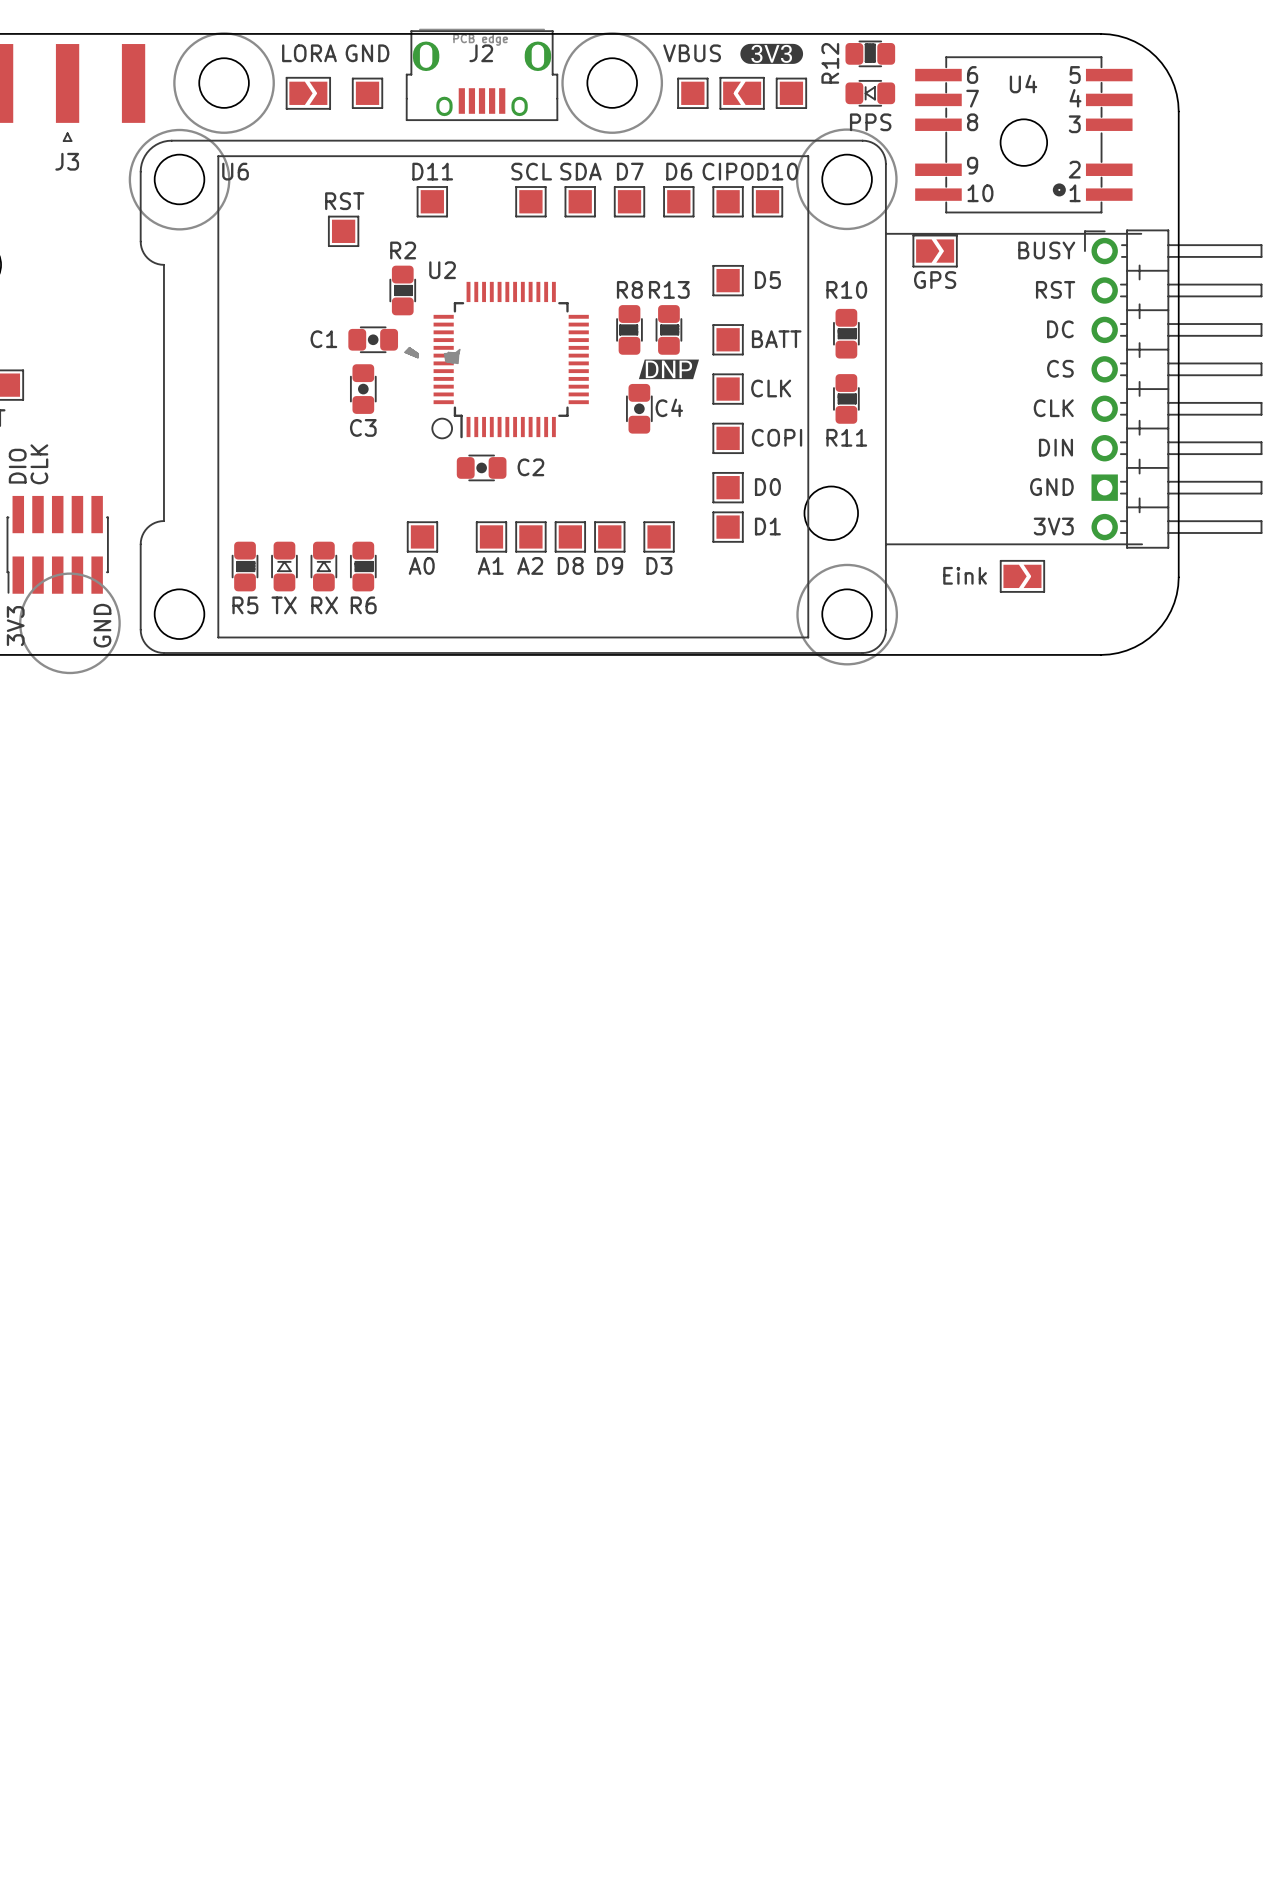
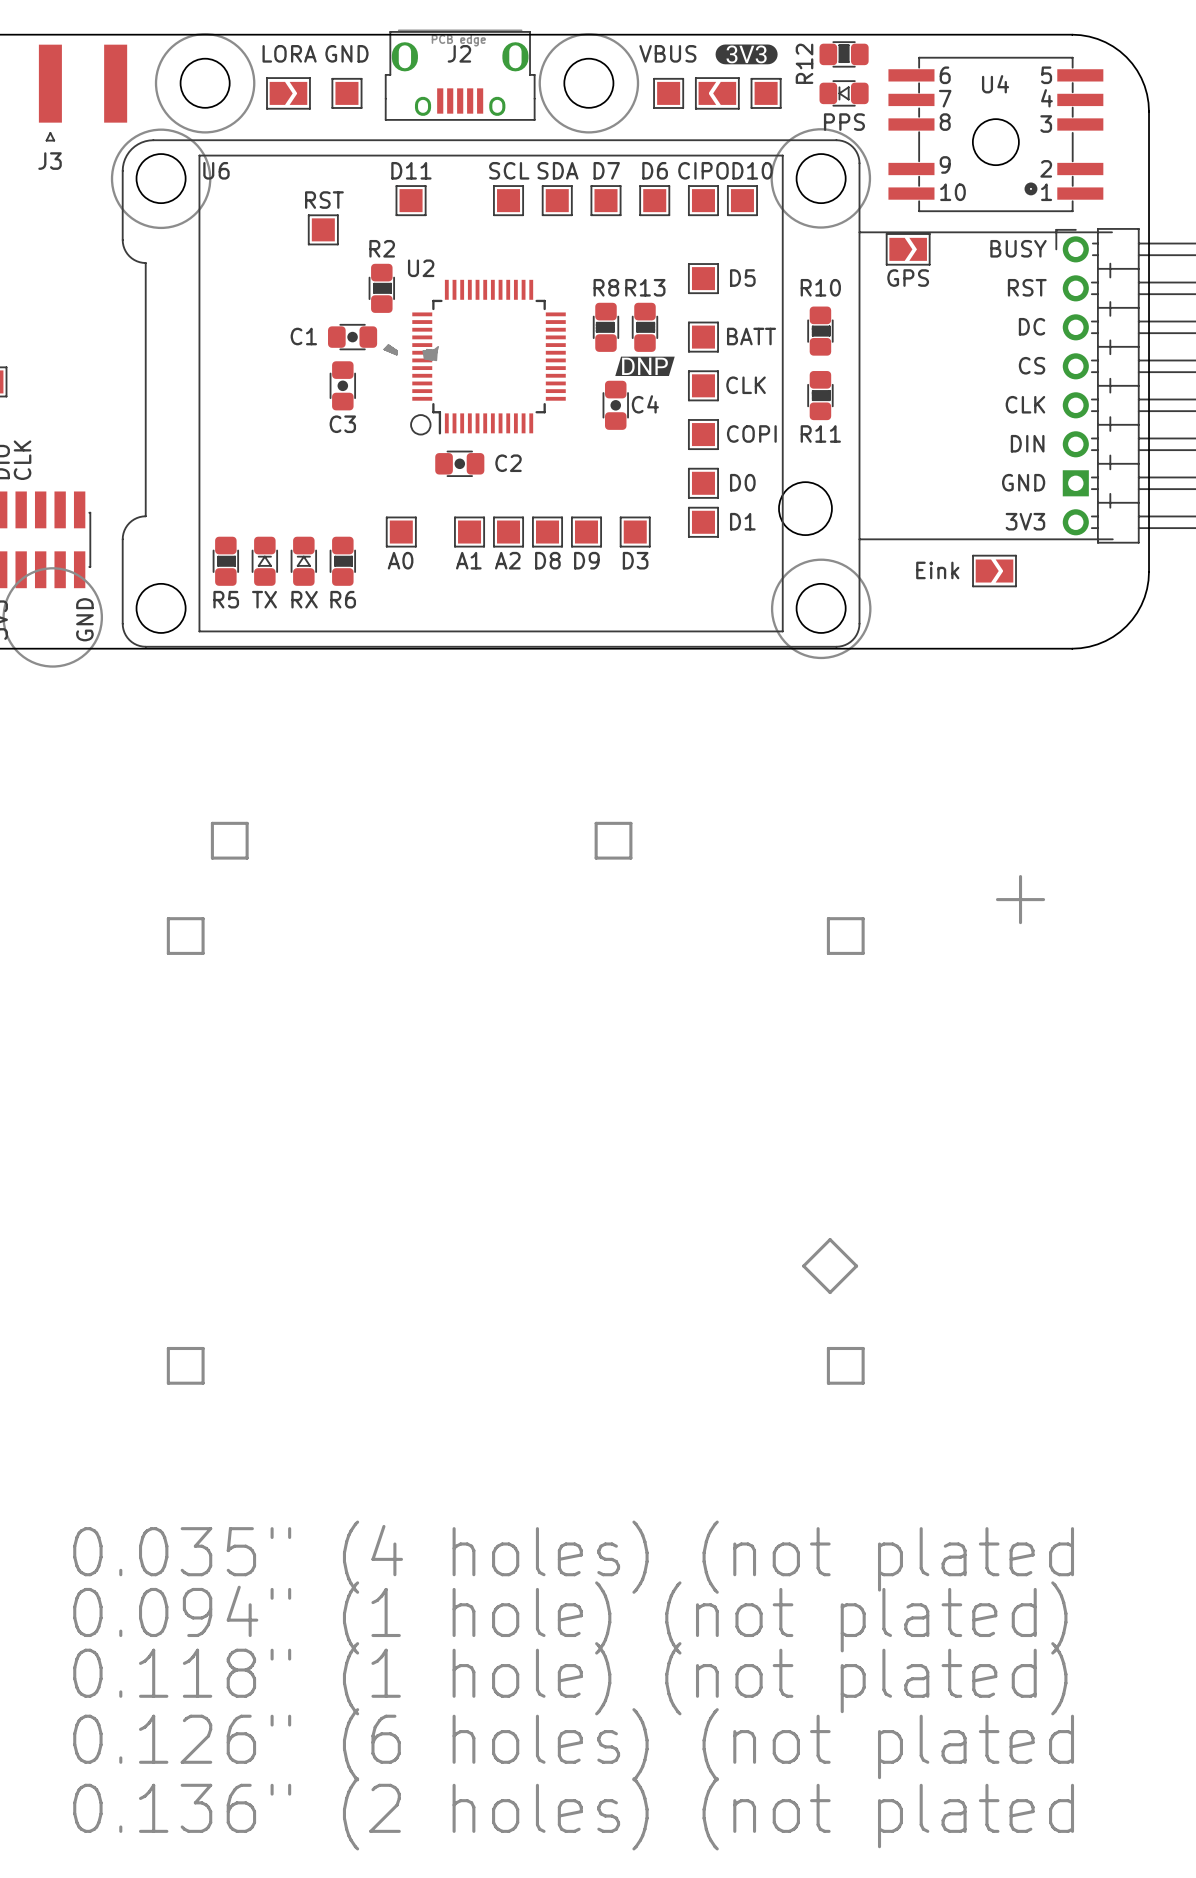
line: none -> (212, 823) (247, 823) (247, 858) (212, 858) (212, 823)
line: none -> (596, 823) (596, 858) (630, 858) (630, 823) (596, 823)
line: none -> (1020, 876) (1020, 922)
line: none -> (997, 899) (1043, 899)
line: none -> (168, 918) (203, 918) (203, 953) (168, 953) (168, 918)
line: none -> (828, 918) (828, 953) (863, 953) (863, 918) (828, 918)
line: none -> (830, 1239) (803, 1266) (830, 1292) (856, 1266) (830, 1239)
line: none -> (168, 1348) (203, 1348) (203, 1383) (168, 1383) (168, 1348)
line: none -> (828, 1348) (828, 1383) (863, 1383) (863, 1348) (828, 1348)
line: none -> (357, 1522) (348, 1535) (344, 1552) (346, 1572) (357, 1592)
line: none -> (633, 1522) (642, 1535) (647, 1552) (644, 1572) (633, 1592)
line: none -> (717, 1522) (708, 1535) (704, 1552) (708, 1579) (717, 1592)
line: none -> (383, 1526) (372, 1559) (401, 1559)
line: none -> (85, 1528) (90, 1528) (96, 1533) (101, 1546) (98, 1565) (94, 1572) (90, 1574) (85, 1574) (79, 1570) (74, 1557) (76, 1537) (79, 1533) (85, 1528)
line: none -> (151, 1528) (155, 1528) (162, 1533) (166, 1546) (164, 1565) (160, 1572) (155, 1574) (151, 1574) (144, 1570) (140, 1557) (142, 1537) (144, 1533) (151, 1528)
line: none -> (182, 1528) (210, 1528) (195, 1546) (201, 1546) (208, 1550) (210, 1554) (210, 1565) (208, 1570) (201, 1574) (188, 1574) (182, 1570)
line: none -> (252, 1528) (230, 1528) (228, 1550) (234, 1546) (245, 1546) (250, 1548) (254, 1554) (254, 1565) (252, 1570) (245, 1574) (234, 1574) (228, 1570)
line: none -> (272, 1528) (272, 1537)
line: none -> (289, 1528) (289, 1537)
line: none -> (454, 1528) (454, 1574)
line: none -> (537, 1528) (537, 1568) (539, 1572) (544, 1574)
line: none -> (818, 1528) (818, 1568) (820, 1572) (829, 1574)
line: none -> (921, 1528) (921, 1568) (923, 1572) (927, 1574)
line: none -> (986, 1528) (986, 1568) (989, 1572) (997, 1574)
line: none -> (1072, 1528) (1072, 1574)
line: none -> (394, 1544) (394, 1574)
line: none -> (502, 1544) (513, 1546) (517, 1552) (517, 1565) (513, 1572) (508, 1574) (497, 1572) (493, 1565) (493, 1552) (495, 1548) (502, 1544)
line: none -> (734, 1544) (734, 1574)
line: none -> (783, 1544) (794, 1546) (798, 1552) (798, 1565) (794, 1572) (789, 1574) (778, 1572) (774, 1565) (774, 1552) (776, 1548) (783, 1544)
line: none -> (811, 1544) (829, 1544)
line: none -> (879, 1544) (879, 1590)
line: none -> (980, 1544) (997, 1544)
line: none -> (616, 1546) (605, 1544) (601, 1546) (598, 1550) (601, 1557) (616, 1561) (618, 1565) (616, 1572) (612, 1574) (598, 1572)
line: none -> (879, 1546) (892, 1544) (897, 1546) (901, 1552) (901, 1565) (897, 1572) (892, 1574) (879, 1572)
line: none -> (945, 1546) (949, 1544) (962, 1546) (965, 1550) (965, 1574)
line: none -> (1072, 1546) (1059, 1544) (1054, 1546) (1050, 1552) (1050, 1565) (1054, 1572) (1059, 1574) (1072, 1572)
line: none -> (454, 1548) (460, 1544) (471, 1546) (473, 1550) (473, 1574)
line: none -> (734, 1548) (741, 1544) (752, 1546) (754, 1550) (754, 1574)
line: none -> (965, 1554) (960, 1557) (949, 1557) (945, 1559) (943, 1563) (945, 1572) (949, 1574) (960, 1574) (965, 1572)
line: none -> (559, 1559) (581, 1554) (579, 1546) (565, 1544) (561, 1546) (559, 1550) (559, 1568) (561, 1572) (565, 1574) (579, 1572)
line: none -> (1011, 1559) (1033, 1554) (1030, 1546) (1017, 1544) (1013, 1546) (1011, 1550) (1011, 1568) (1013, 1572) (1017, 1574) (1030, 1572)
line: none -> (120, 1570) (120, 1574)
line: none -> (357, 1582) (348, 1596) (344, 1613) (346, 1633) (357, 1653)
line: none -> (596, 1582) (605, 1596) (609, 1613) (607, 1633) (596, 1653)
line: none -> (679, 1582) (671, 1596) (666, 1613) (669, 1633) (679, 1653)
line: none -> (1052, 1582) (1061, 1596) (1065, 1613) (1063, 1633) (1059, 1644) (1052, 1653)
line: none -> (239, 1587) (228, 1620) (256, 1620)
line: none -> (85, 1589) (90, 1589) (96, 1593) (101, 1606) (98, 1626) (96, 1631) (90, 1635) (85, 1635) (79, 1631) (74, 1617) (76, 1598) (79, 1593) (85, 1589)
line: none -> (151, 1589) (155, 1589) (162, 1593) (166, 1606) (164, 1626) (160, 1633) (155, 1635) (151, 1635) (144, 1631) (140, 1617) (142, 1598) (147, 1591) (151, 1589)
line: none -> (272, 1589) (272, 1598)
line: none -> (289, 1589) (289, 1598)
line: none -> (454, 1589) (454, 1635)
line: none -> (537, 1589) (537, 1628) (539, 1633) (544, 1635)
line: none -> (780, 1589) (780, 1628) (783, 1633) (791, 1635)
line: none -> (883, 1589) (883, 1628) (886, 1633) (890, 1635)
line: none -> (949, 1589) (949, 1628) (951, 1633) (960, 1635)
line: none -> (1035, 1589) (1035, 1635)
line: none -> (372, 1602) (381, 1596) (386, 1589) (386, 1635)
line: none -> (250, 1604) (250, 1635)
line: none -> (502, 1604) (513, 1606) (517, 1613) (517, 1626) (513, 1633) (508, 1635) (497, 1633) (493, 1626) (493, 1613) (497, 1606) (502, 1604)
line: none -> (697, 1604) (697, 1635)
line: none -> (745, 1604) (756, 1606) (761, 1613) (761, 1626) (758, 1631) (752, 1635) (741, 1633) (736, 1626) (736, 1613) (739, 1609) (745, 1604)
line: none -> (774, 1604) (791, 1604)
line: none -> (842, 1604) (842, 1650)
line: none -> (943, 1604) (960, 1604)
line: none -> (842, 1606) (855, 1604) (859, 1606) (864, 1613) (864, 1626) (859, 1633) (855, 1635) (842, 1633)
line: none -> (908, 1606) (912, 1604) (925, 1606) (927, 1611) (927, 1635)
line: none -> (1035, 1606) (1022, 1604) (1015, 1609) (1013, 1613) (1013, 1626) (1017, 1633) (1022, 1635) (1035, 1633)
line: none -> (210, 1609) (208, 1613) (201, 1617) (188, 1615) (184, 1609) (184, 1598) (186, 1593) (193, 1589) (201, 1589) (206, 1591) (210, 1598) (210, 1615) (208, 1624) (201, 1633) (188, 1635)
line: none -> (454, 1609) (460, 1604) (471, 1606) (473, 1611) (473, 1635)
line: none -> (697, 1609) (704, 1604) (715, 1606) (717, 1611) (717, 1635)
line: none -> (927, 1615) (923, 1617) (912, 1617) (908, 1620) (905, 1624) (908, 1633) (912, 1635) (923, 1635) (927, 1633)
line: none -> (559, 1620) (581, 1615) (579, 1606) (565, 1604) (561, 1606) (559, 1611) (559, 1628) (561, 1633) (565, 1635) (579, 1633)
line: none -> (973, 1620) (995, 1615) (993, 1606) (980, 1604) (976, 1606) (973, 1611) (973, 1628) (976, 1633) (980, 1635) (993, 1633)
line: none -> (120, 1631) (120, 1635)
line: none -> (372, 1635) (399, 1635)
line: none -> (357, 1643) (348, 1656) (344, 1674) (346, 1694) (357, 1713)
line: none -> (596, 1643) (605, 1656) (609, 1674) (607, 1694) (596, 1713)
line: none -> (679, 1643) (671, 1656) (666, 1674) (669, 1694) (679, 1713)
line: none -> (1052, 1643) (1061, 1656) (1065, 1674) (1063, 1694) (1059, 1705) (1052, 1713)
line: none -> (85, 1650) (90, 1650) (96, 1654) (101, 1667) (98, 1687) (94, 1694) (90, 1696) (85, 1696) (79, 1691) (74, 1678) (76, 1659) (79, 1654) (85, 1650)
line: none -> (272, 1650) (272, 1659)
line: none -> (289, 1650) (289, 1659)
line: none -> (454, 1650) (454, 1696)
line: none -> (537, 1650) (537, 1689) (539, 1694) (544, 1696)
line: none -> (780, 1650) (780, 1689) (783, 1694) (791, 1696)
line: none -> (883, 1650) (883, 1689) (886, 1694) (890, 1696)
line: none -> (949, 1650) (949, 1689) (951, 1694) (960, 1696)
line: none -> (1035, 1650) (1035, 1696)
line: none -> (140, 1663) (149, 1656) (153, 1650) (153, 1696)
line: none -> (184, 1663) (193, 1656) (197, 1650) (197, 1696)
line: none -> (372, 1663) (381, 1656) (386, 1650) (386, 1696)
line: none -> (502, 1665) (513, 1667) (517, 1674) (517, 1687) (513, 1694) (508, 1696) (497, 1694) (493, 1687) (493, 1674) (495, 1669) (502, 1665)
line: none -> (697, 1665) (697, 1696)
line: none -> (745, 1665) (756, 1667) (761, 1674) (761, 1687) (756, 1694) (752, 1696) (741, 1694) (736, 1687) (736, 1674) (739, 1669) (745, 1665)
line: none -> (774, 1665) (791, 1665)
line: none -> (842, 1665) (842, 1711)
line: none -> (943, 1665) (960, 1665)
line: none -> (842, 1667) (855, 1665) (859, 1667) (864, 1674) (864, 1687) (859, 1694) (855, 1696) (842, 1694)
line: none -> (908, 1667) (912, 1665) (925, 1667) (927, 1672) (927, 1696)
line: none -> (1035, 1667) (1022, 1665) (1015, 1669) (1013, 1674) (1013, 1687) (1017, 1694) (1022, 1696) (1035, 1694)
line: none -> (237, 1669) (232, 1672) (228, 1678) (228, 1687) (232, 1694) (237, 1696) (245, 1696) (252, 1691) (254, 1687) (254, 1678) (250, 1672) (245, 1669)
line: none -> (237, 1669) (245, 1669)
line: none -> (237, 1669) (232, 1667) (228, 1661) (230, 1654) (237, 1650) (245, 1650) (252, 1654) (254, 1659) (252, 1665) (245, 1669)
line: none -> (454, 1669) (460, 1665) (471, 1667) (473, 1672) (473, 1696)
line: none -> (697, 1669) (704, 1665) (715, 1667) (717, 1672) (717, 1696)
line: none -> (927, 1676) (923, 1678) (912, 1678) (908, 1680) (905, 1685) (908, 1694) (912, 1696) (923, 1696) (927, 1694)
line: none -> (559, 1680) (581, 1676) (579, 1667) (565, 1665) (561, 1667) (559, 1672) (559, 1689) (561, 1694) (565, 1696) (579, 1694)
line: none -> (973, 1680) (995, 1676) (993, 1667) (980, 1665) (976, 1667) (973, 1672) (973, 1689) (976, 1694) (980, 1696) (993, 1694)
line: none -> (120, 1691) (120, 1696)
line: none -> (140, 1696) (166, 1696)
line: none -> (184, 1696) (210, 1696)
line: none -> (372, 1696) (399, 1696)
line: none -> (357, 1709) (348, 1722) (344, 1740) (346, 1760) (357, 1779)
line: none -> (633, 1709) (642, 1722) (647, 1740) (644, 1760) (633, 1779)
line: none -> (717, 1709) (708, 1722) (704, 1740) (708, 1766) (717, 1779)
line: none -> (85, 1716) (90, 1716) (96, 1720) (101, 1733) (98, 1753) (94, 1760) (90, 1762) (85, 1762) (79, 1757) (74, 1744) (76, 1725) (79, 1720) (85, 1716)
line: none -> (250, 1716) (237, 1718) (230, 1727) (228, 1735) (228, 1753) (232, 1760) (237, 1762) (245, 1762) (252, 1757) (254, 1753) (254, 1742) (250, 1735) (237, 1733) (232, 1735) (230, 1738) (228, 1742)
line: none -> (272, 1716) (272, 1725)
line: none -> (289, 1716) (289, 1725)
line: none -> (394, 1716) (381, 1718) (375, 1727) (372, 1735) (372, 1753) (377, 1760) (381, 1762) (390, 1762) (397, 1757) (399, 1753) (399, 1742) (394, 1735) (381, 1733) (377, 1735) (375, 1738) (372, 1742)
line: none -> (454, 1716) (454, 1762)
line: none -> (537, 1716) (537, 1755) (539, 1760) (544, 1762)
line: none -> (818, 1716) (818, 1755) (820, 1760) (829, 1762)
line: none -> (921, 1716) (921, 1755) (923, 1760) (927, 1762)
line: none -> (986, 1716) (986, 1755) (989, 1760) (997, 1762)
line: none -> (1072, 1716) (1072, 1762)
line: none -> (184, 1720) (190, 1716) (201, 1716) (208, 1720) (210, 1729) (208, 1735) (182, 1762) (210, 1762)
line: none -> (140, 1729) (149, 1722) (153, 1716) (153, 1762)
line: none -> (502, 1731) (513, 1733) (517, 1740) (517, 1753) (513, 1760) (508, 1762) (497, 1760) (493, 1753) (493, 1740) (495, 1735) (502, 1731)
line: none -> (734, 1731) (734, 1762)
line: none -> (783, 1731) (794, 1733) (798, 1740) (798, 1753) (794, 1760) (789, 1762) (778, 1760) (774, 1753) (774, 1740) (776, 1735) (783, 1731)
line: none -> (811, 1731) (829, 1731)
line: none -> (879, 1731) (879, 1777)
line: none -> (980, 1731) (997, 1731)
line: none -> (616, 1733) (605, 1731) (601, 1733) (598, 1738) (601, 1744) (616, 1749) (618, 1753) (616, 1760) (612, 1762) (598, 1760)
line: none -> (879, 1733) (892, 1731) (897, 1733) (901, 1740) (901, 1753) (897, 1760) (892, 1762) (879, 1760)
line: none -> (945, 1733) (949, 1731) (962, 1733) (965, 1738) (965, 1762)
line: none -> (1072, 1733) (1059, 1731) (1054, 1733) (1050, 1740) (1050, 1753) (1054, 1760) (1059, 1762) (1072, 1760)
line: none -> (454, 1735) (460, 1731) (471, 1733) (473, 1738) (473, 1762)
line: none -> (734, 1735) (741, 1731) (752, 1733) (754, 1738) (754, 1762)
line: none -> (965, 1742) (960, 1744) (949, 1744) (945, 1746) (943, 1751) (945, 1760) (949, 1762) (960, 1762) (965, 1760)
line: none -> (559, 1746) (581, 1742) (579, 1733) (565, 1731) (561, 1733) (559, 1738) (559, 1755) (561, 1760) (565, 1762) (579, 1760)
line: none -> (1011, 1746) (1033, 1742) (1030, 1733) (1017, 1731) (1013, 1733) (1011, 1738) (1011, 1755) (1013, 1760) (1017, 1762) (1030, 1760)
line: none -> (120, 1757) (120, 1762)
line: none -> (140, 1762) (166, 1762)
line: none -> (357, 1778) (348, 1791) (344, 1809) (346, 1829) (357, 1848)
line: none -> (633, 1778) (642, 1791) (647, 1809) (644, 1829) (633, 1848)
line: none -> (717, 1778) (708, 1791) (704, 1809) (708, 1835) (717, 1848)
line: none -> (85, 1785) (90, 1785) (96, 1789) (101, 1802) (98, 1822) (94, 1829) (90, 1831) (85, 1831) (79, 1826) (74, 1813) (76, 1794) (79, 1789) (85, 1785)
line: none -> (182, 1785) (210, 1785) (195, 1802) (201, 1802) (208, 1807) (210, 1811) (210, 1822) (208, 1826) (201, 1831) (188, 1831) (182, 1826)
line: none -> (250, 1785) (237, 1787) (230, 1796) (228, 1805) (228, 1822) (232, 1829) (237, 1831) (245, 1831) (252, 1826) (254, 1822) (254, 1811) (250, 1805) (237, 1802) (232, 1805) (230, 1807) (228, 1811)
line: none -> (272, 1785) (272, 1794)
line: none -> (289, 1785) (289, 1794)
line: none -> (454, 1785) (454, 1831)
line: none -> (537, 1785) (537, 1824) (539, 1829) (544, 1831)
line: none -> (818, 1785) (818, 1824) (820, 1829) (829, 1831)
line: none -> (921, 1785) (921, 1824) (923, 1829) (927, 1831)
line: none -> (986, 1785) (986, 1824) (989, 1829) (997, 1831)
line: none -> (1072, 1785) (1072, 1831)
line: none -> (372, 1789) (379, 1785) (390, 1785) (397, 1789) (399, 1798) (397, 1805) (370, 1831) (399, 1831)
line: none -> (140, 1798) (149, 1791) (153, 1785) (153, 1831)
line: none -> (502, 1800) (513, 1802) (517, 1809) (517, 1822) (513, 1829) (508, 1831) (497, 1829) (493, 1822) (493, 1809) (495, 1805) (502, 1800)
line: none -> (734, 1800) (734, 1831)
line: none -> (783, 1800) (794, 1802) (798, 1809) (798, 1822) (794, 1829) (789, 1831) (778, 1829) (774, 1822) (774, 1809) (776, 1805) (783, 1800)
line: none -> (811, 1800) (829, 1800)
line: none -> (879, 1800) (879, 1846)
line: none -> (980, 1800) (997, 1800)
line: none -> (616, 1802) (605, 1800) (601, 1802) (598, 1807) (601, 1813) (616, 1818) (618, 1822) (616, 1829) (612, 1831) (598, 1829)
line: none -> (879, 1802) (892, 1800) (897, 1802) (901, 1809) (901, 1822) (897, 1829) (892, 1831) (879, 1829)
line: none -> (945, 1802) (949, 1800) (962, 1802) (965, 1807) (965, 1831)
line: none -> (1072, 1802) (1059, 1800) (1054, 1802) (1050, 1809) (1050, 1822) (1054, 1829) (1059, 1831) (1072, 1829)
line: none -> (454, 1805) (460, 1800) (471, 1802) (473, 1807) (473, 1831)
line: none -> (734, 1805) (741, 1800) (752, 1802) (754, 1807) (754, 1831)
line: none -> (965, 1811) (960, 1813) (949, 1813) (945, 1816) (943, 1820) (945, 1829) (949, 1831) (960, 1831) (965, 1829)
line: none -> (559, 1816) (581, 1811) (579, 1802) (565, 1800) (561, 1802) (559, 1807) (559, 1824) (561, 1829) (565, 1831) (579, 1829)
line: none -> (1011, 1816) (1033, 1811) (1030, 1802) (1017, 1800) (1013, 1802) (1011, 1807) (1011, 1824) (1013, 1829) (1017, 1831) (1030, 1829)
line: none -> (120, 1826) (120, 1831)
line: none -> (140, 1831) (166, 1831)

